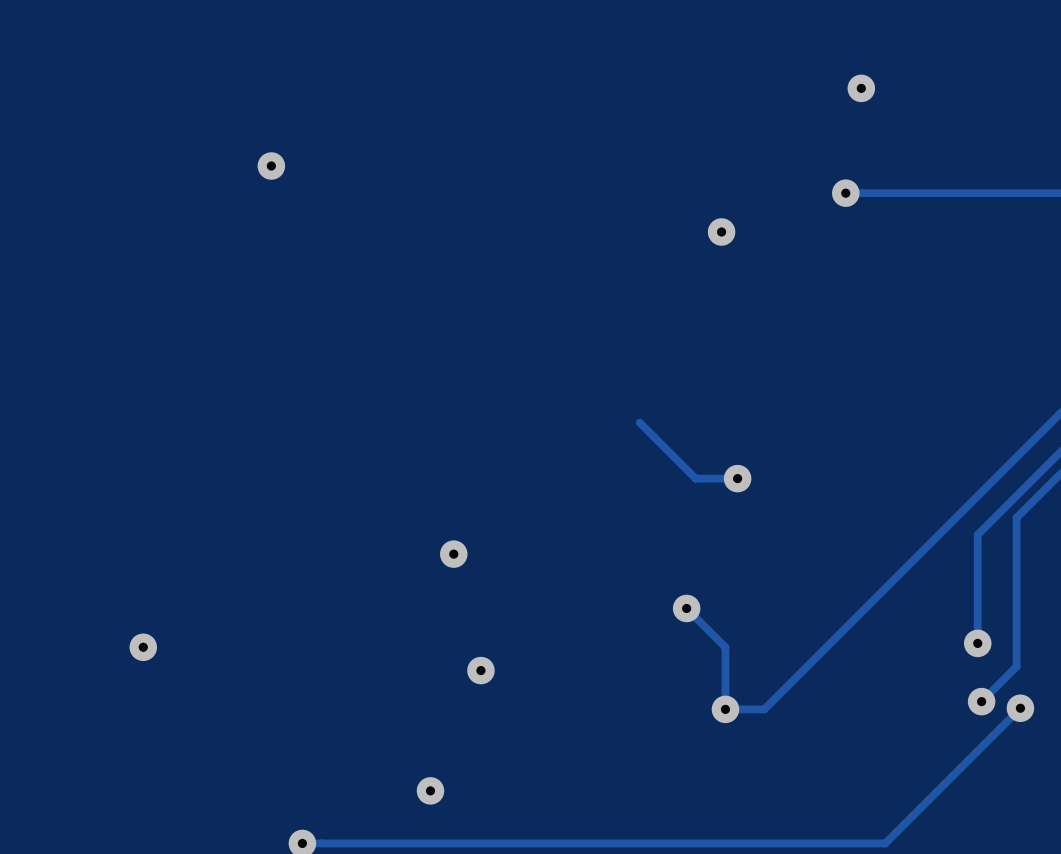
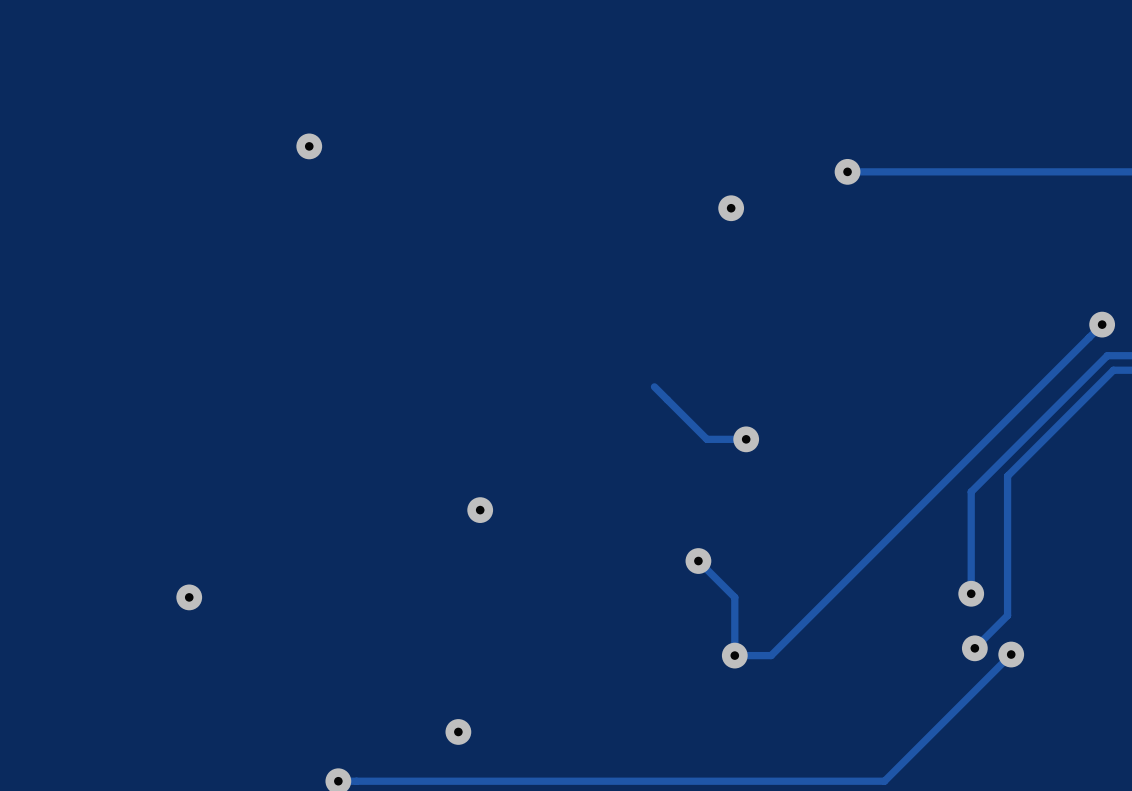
via: (861, 88) -> none
via: (480, 670) -> none

